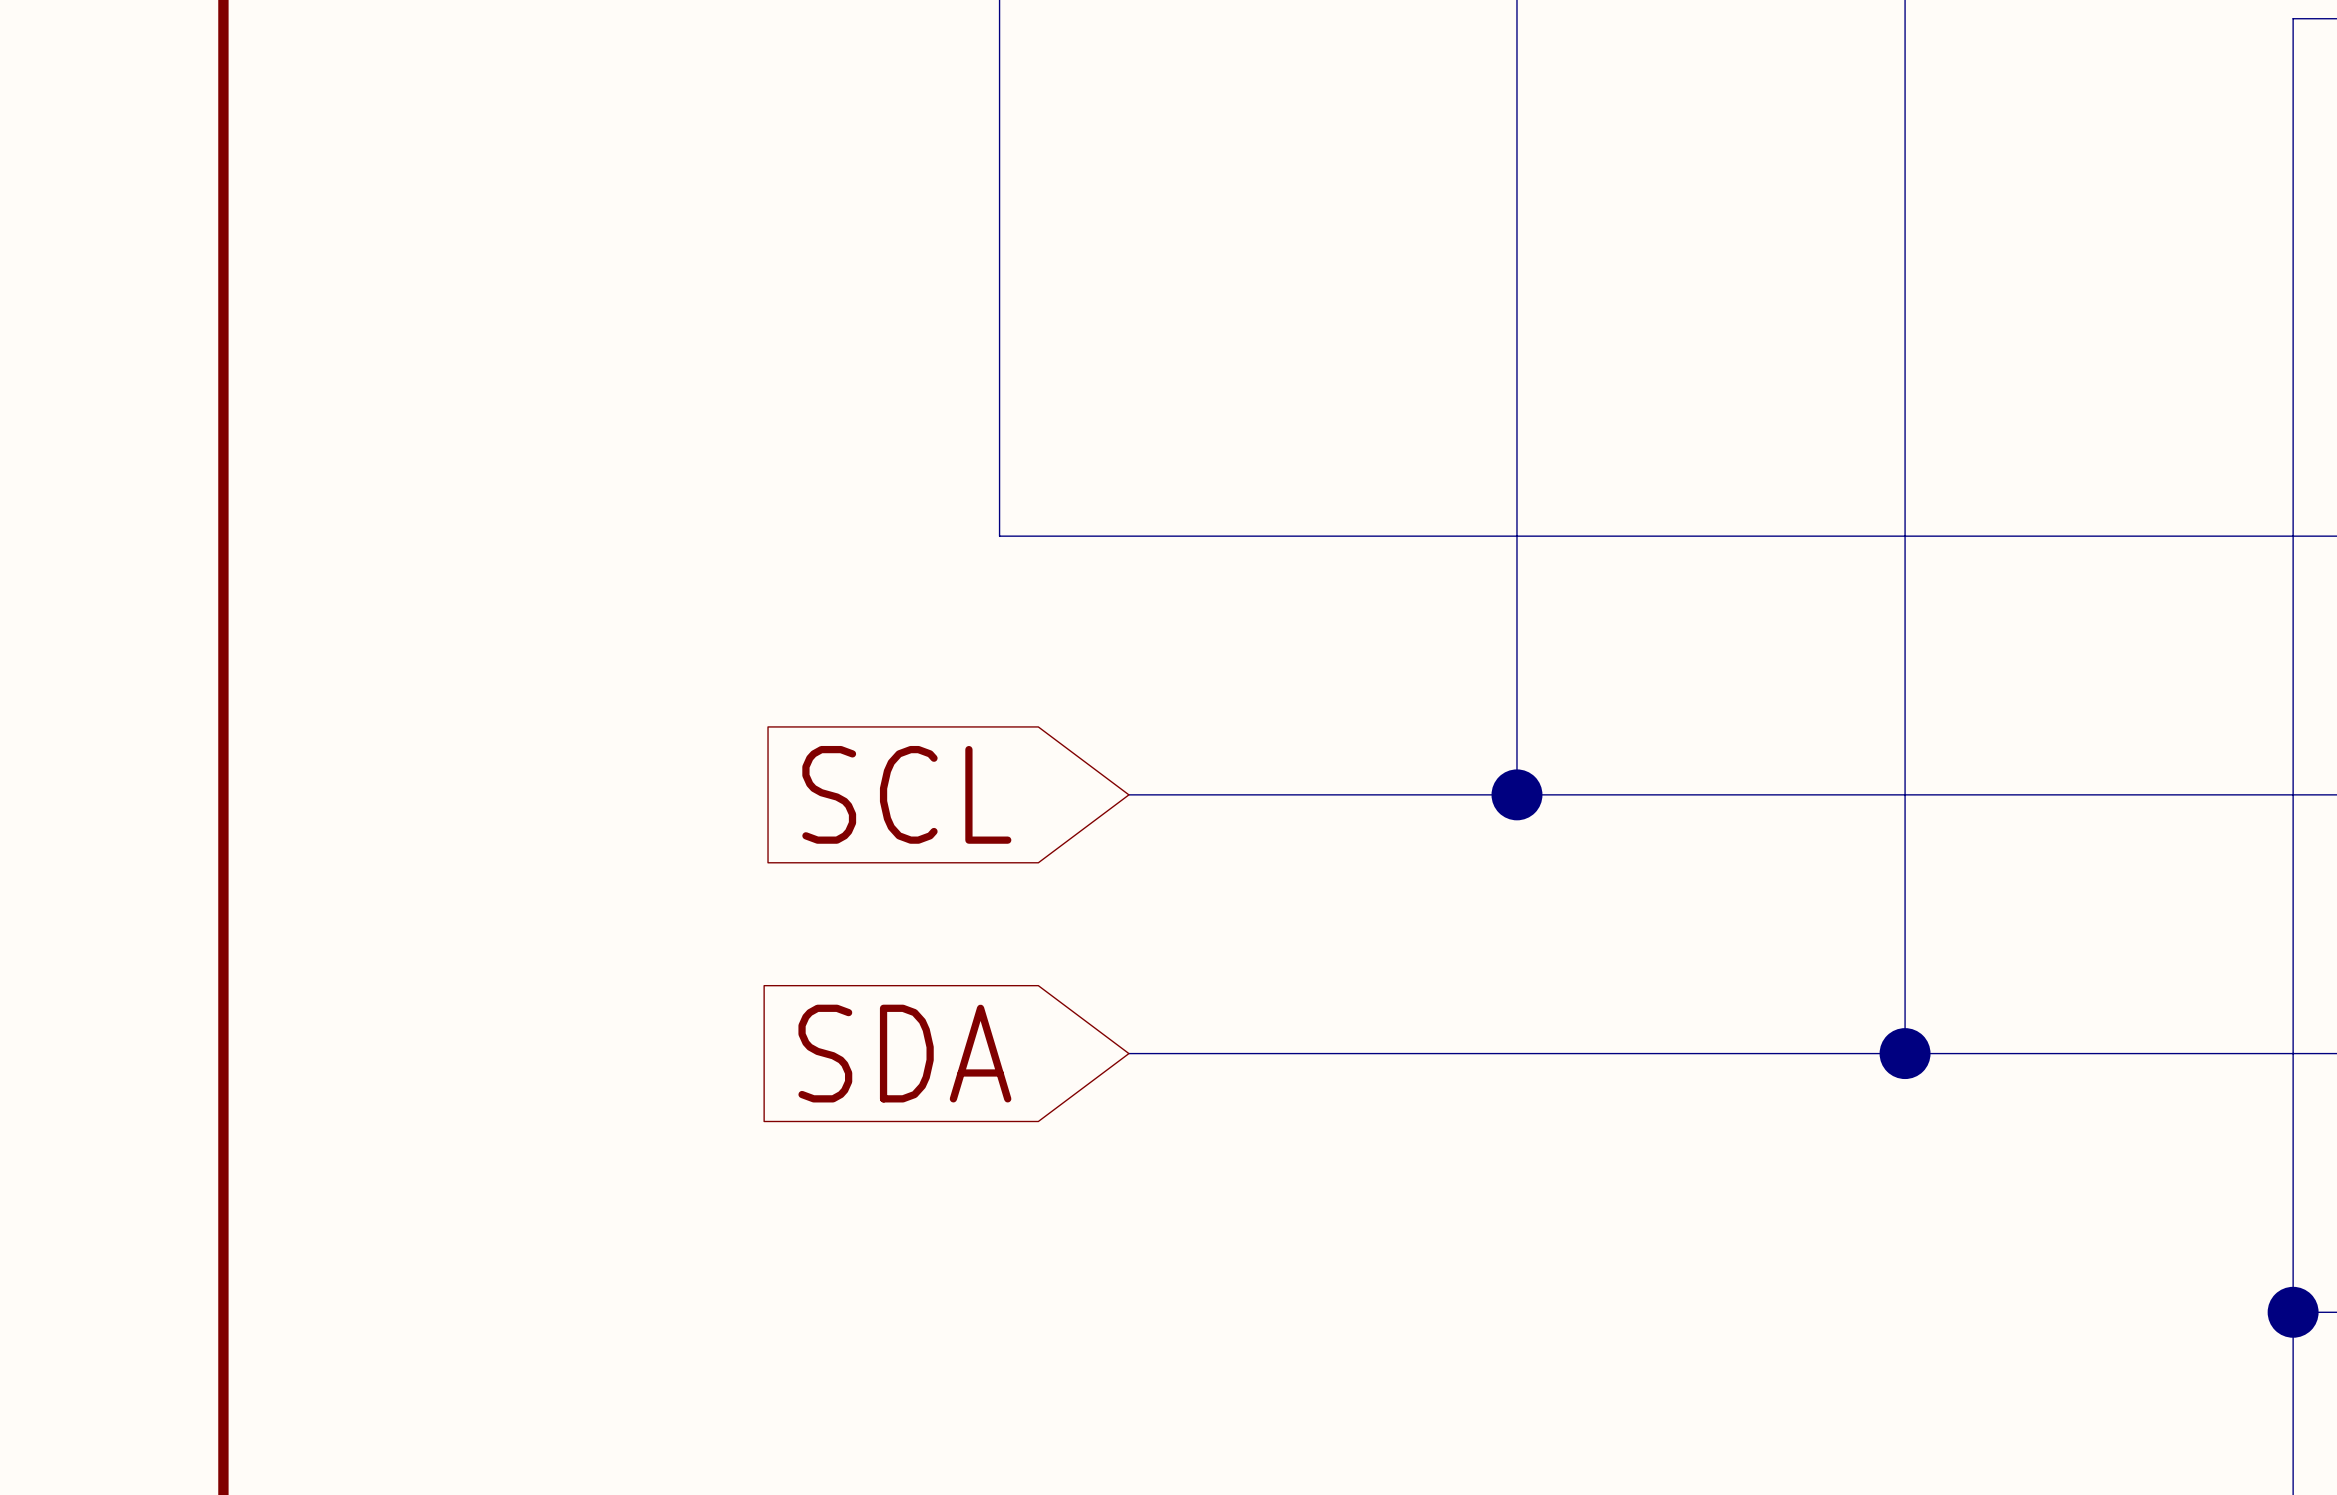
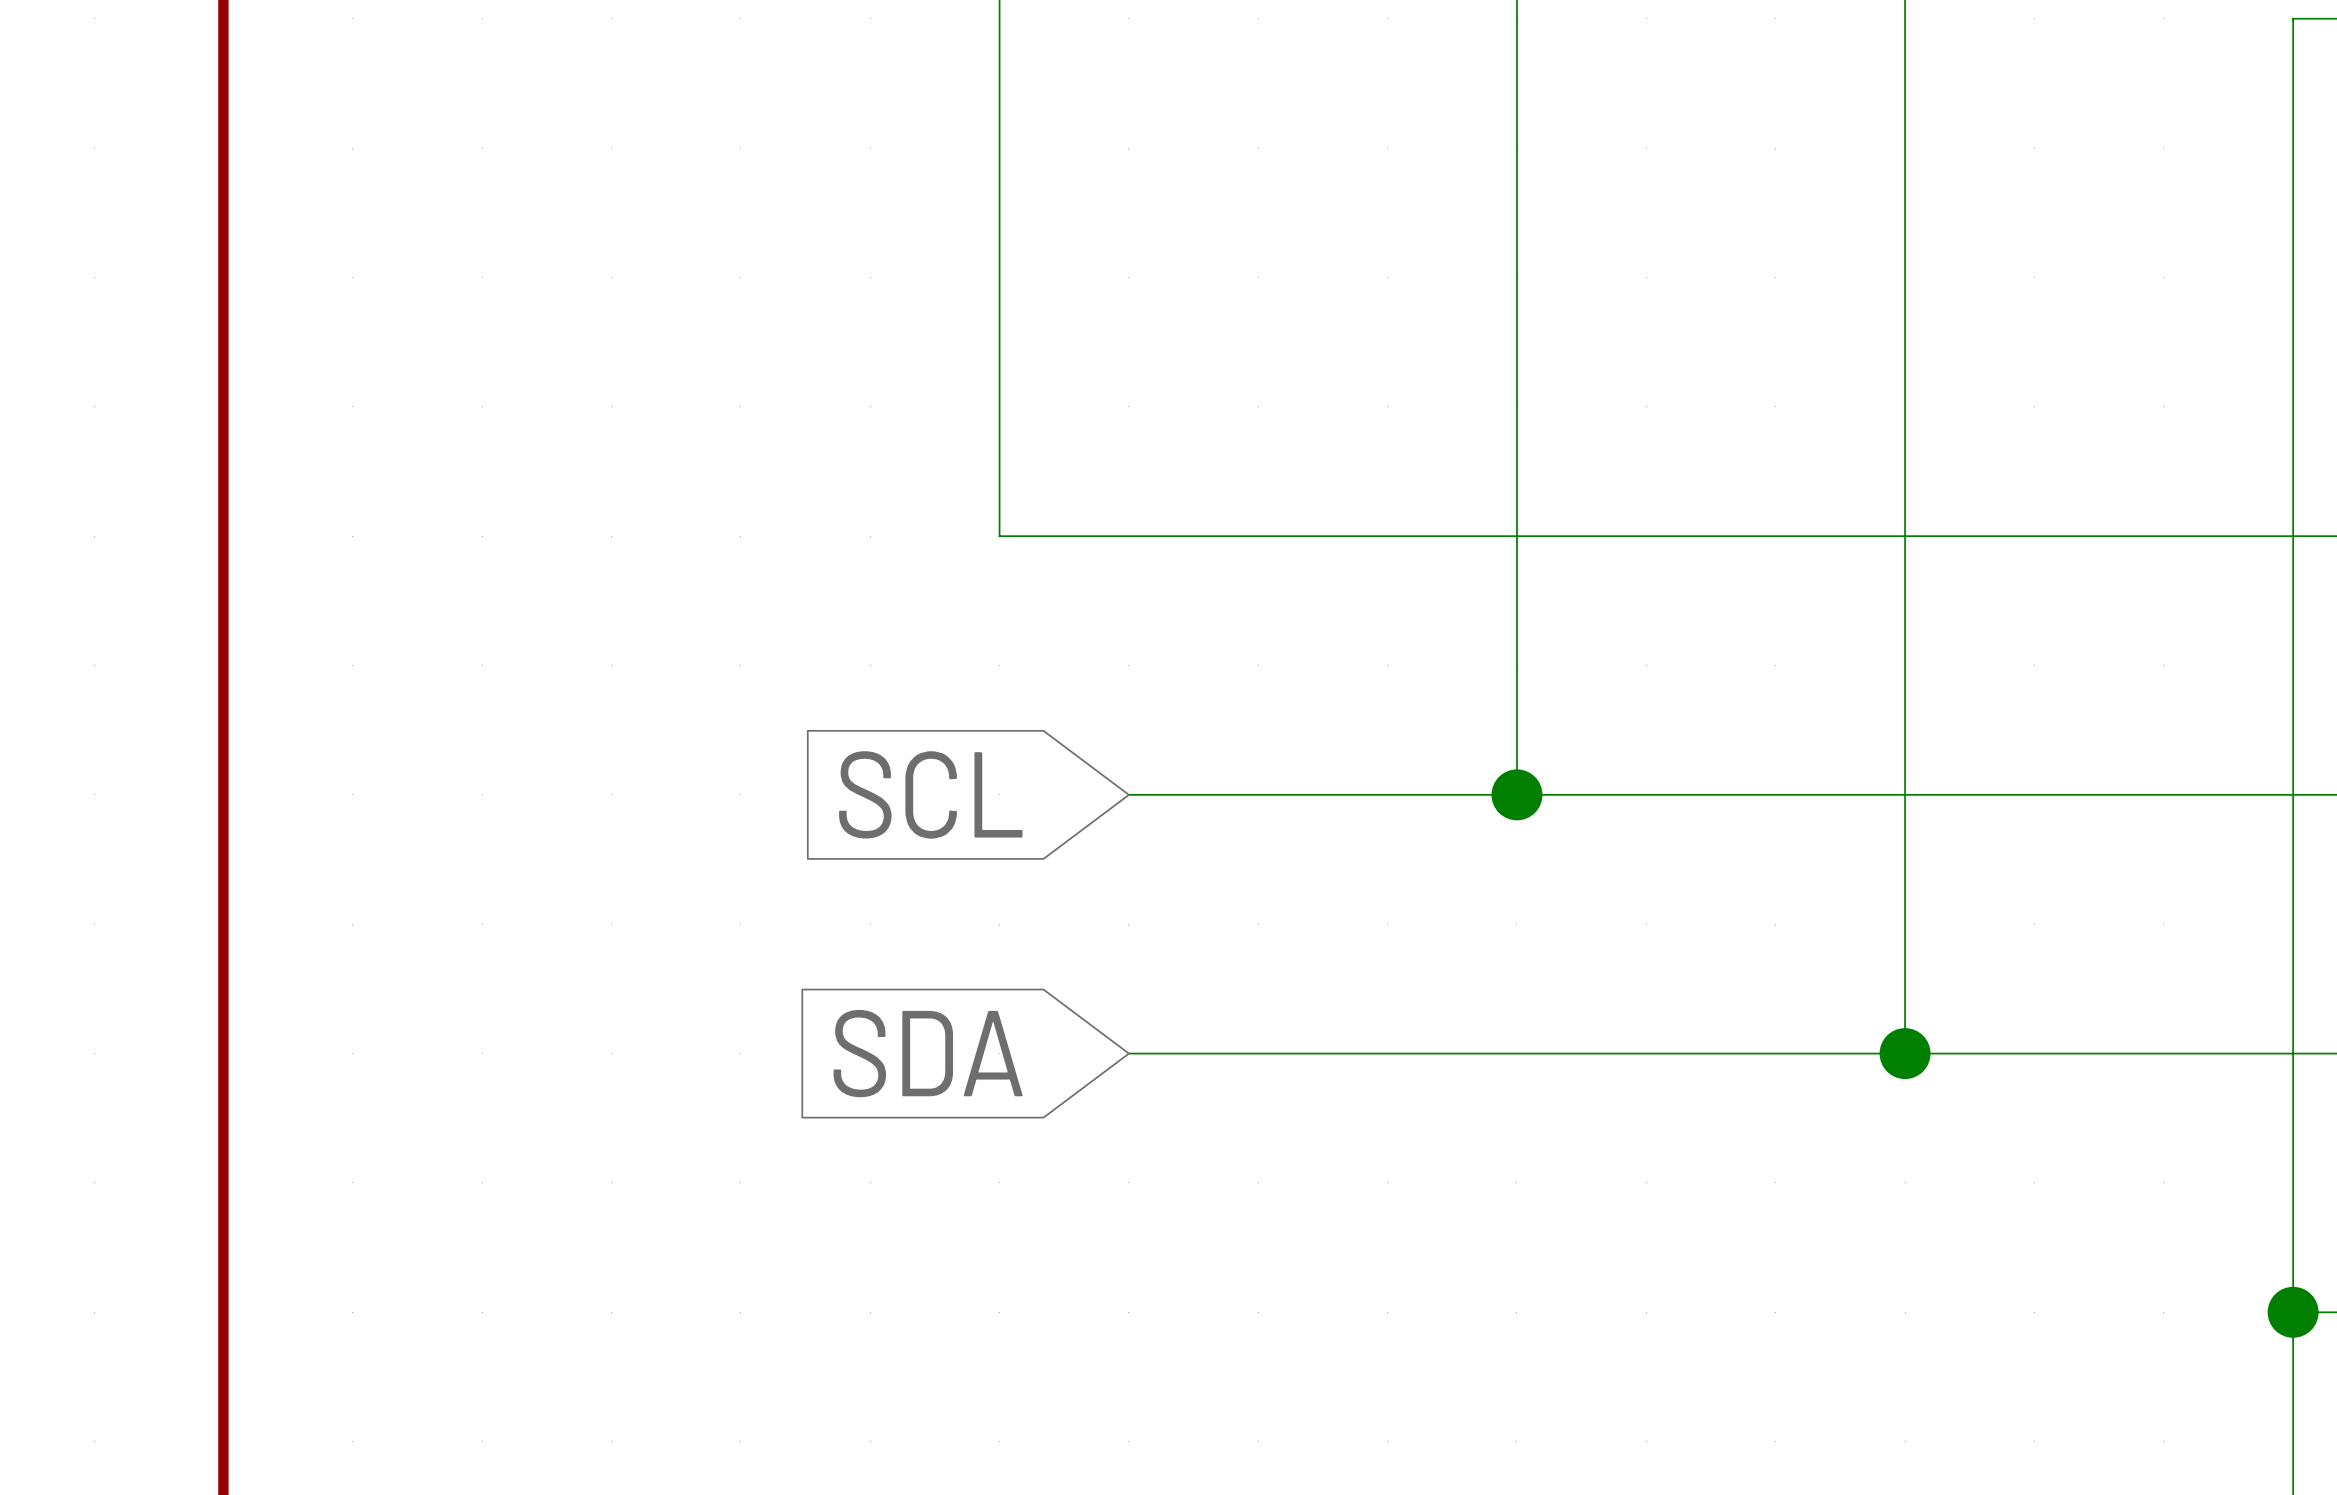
global label position: SCL (906, 794) -> SCL (930, 794)
global label position: SDA (904, 1053) -> SDA (928, 1053)

